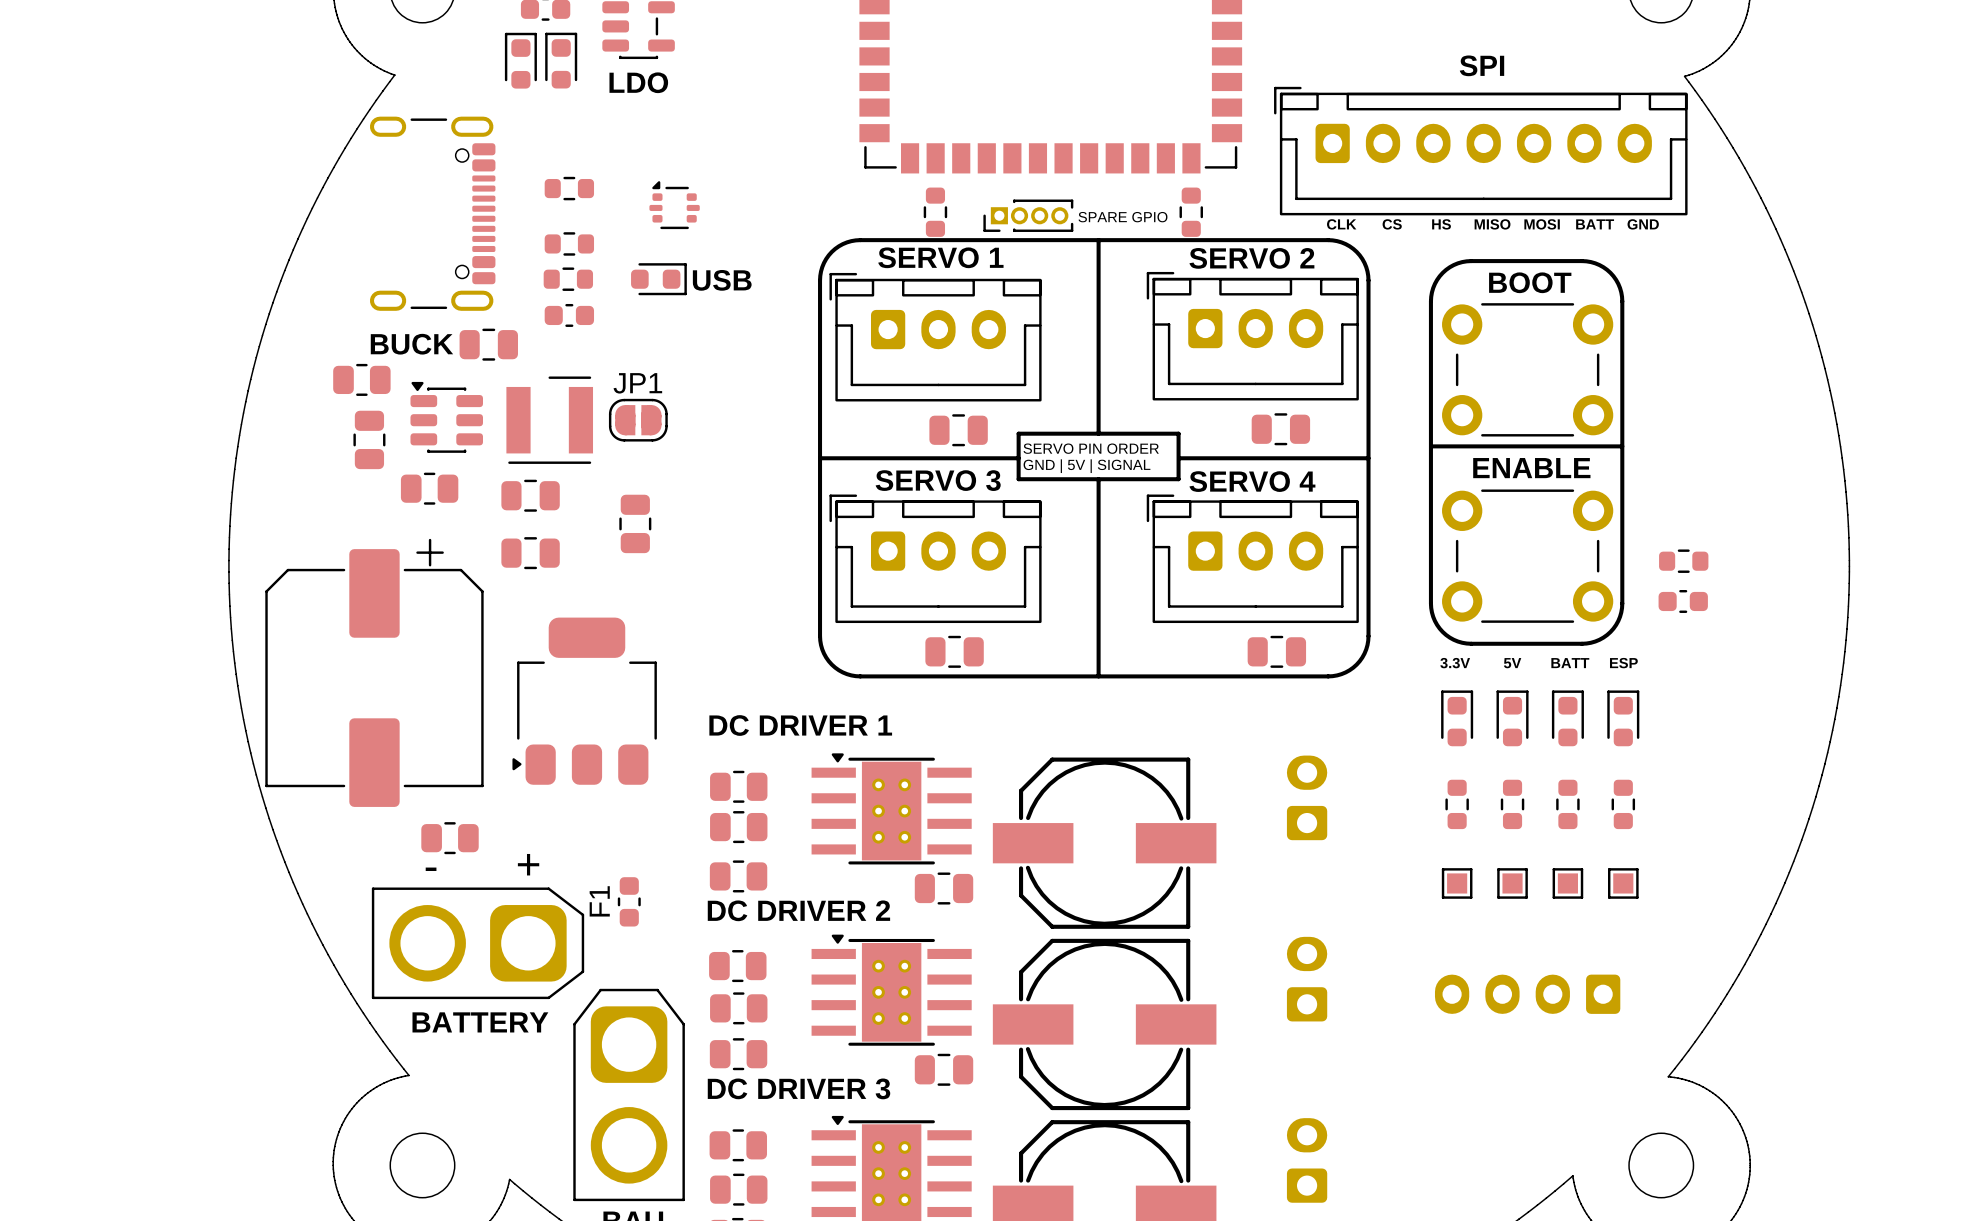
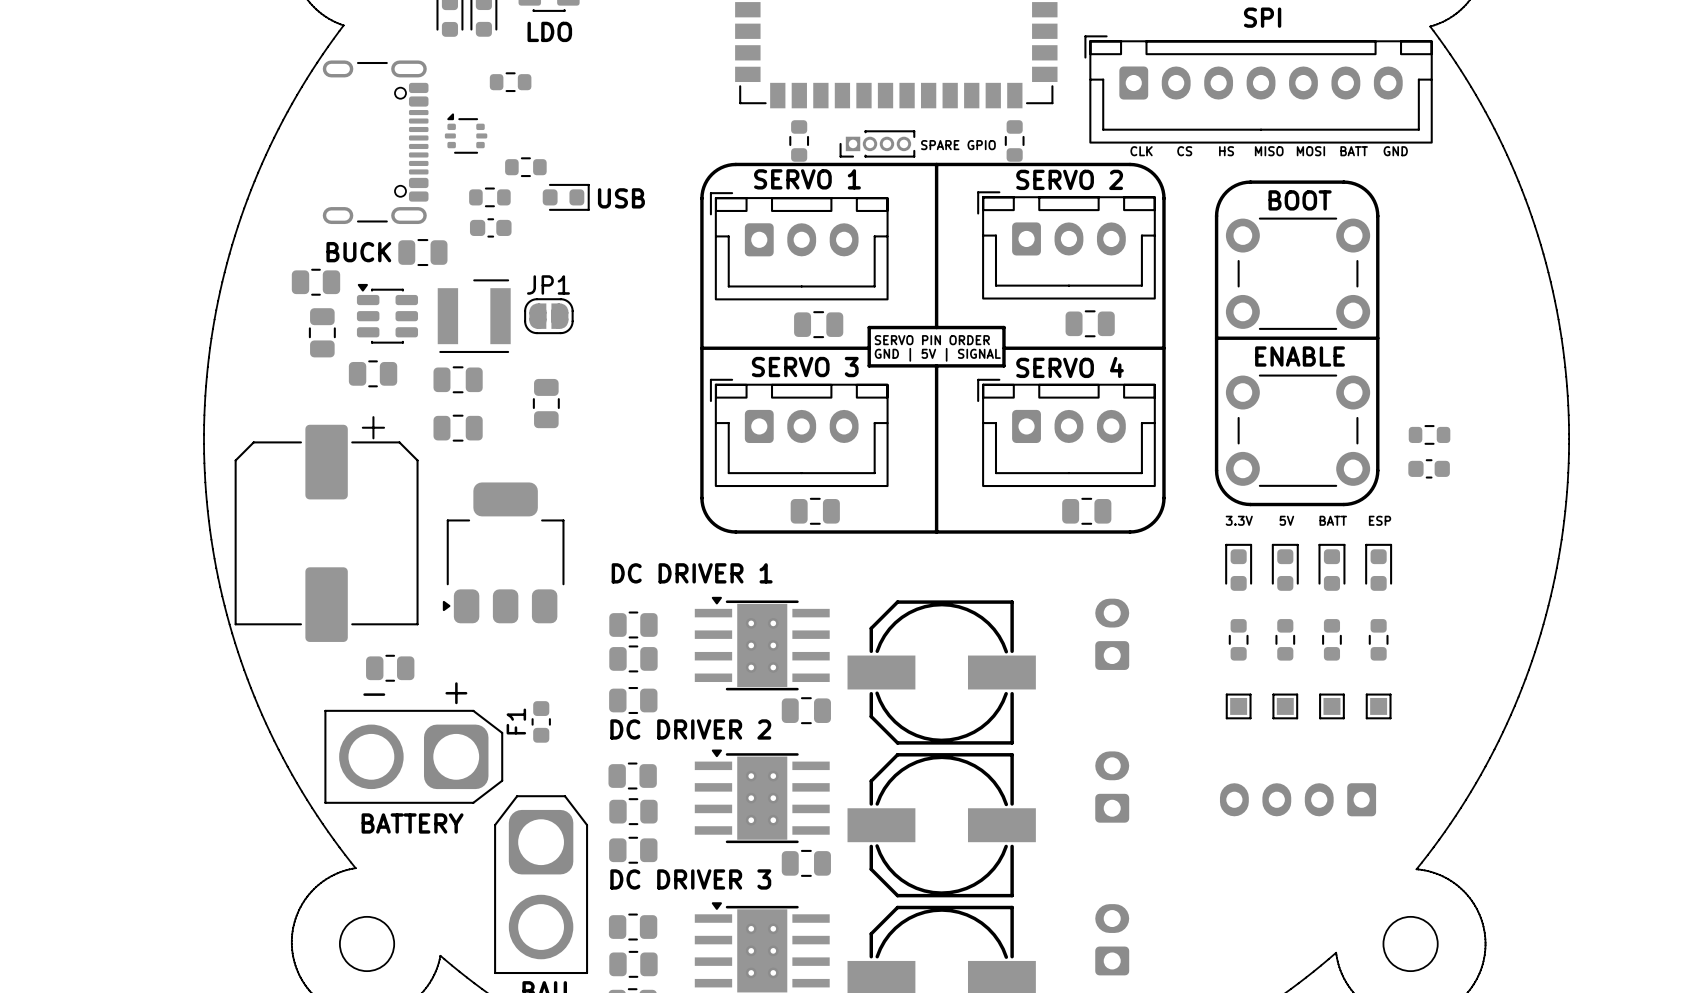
part: none -> (510, 82)
part: (569, 188) -> none
part position: (674, 205) -> (466, 133)
part: (569, 243) -> none
part: none -> (525, 167)

